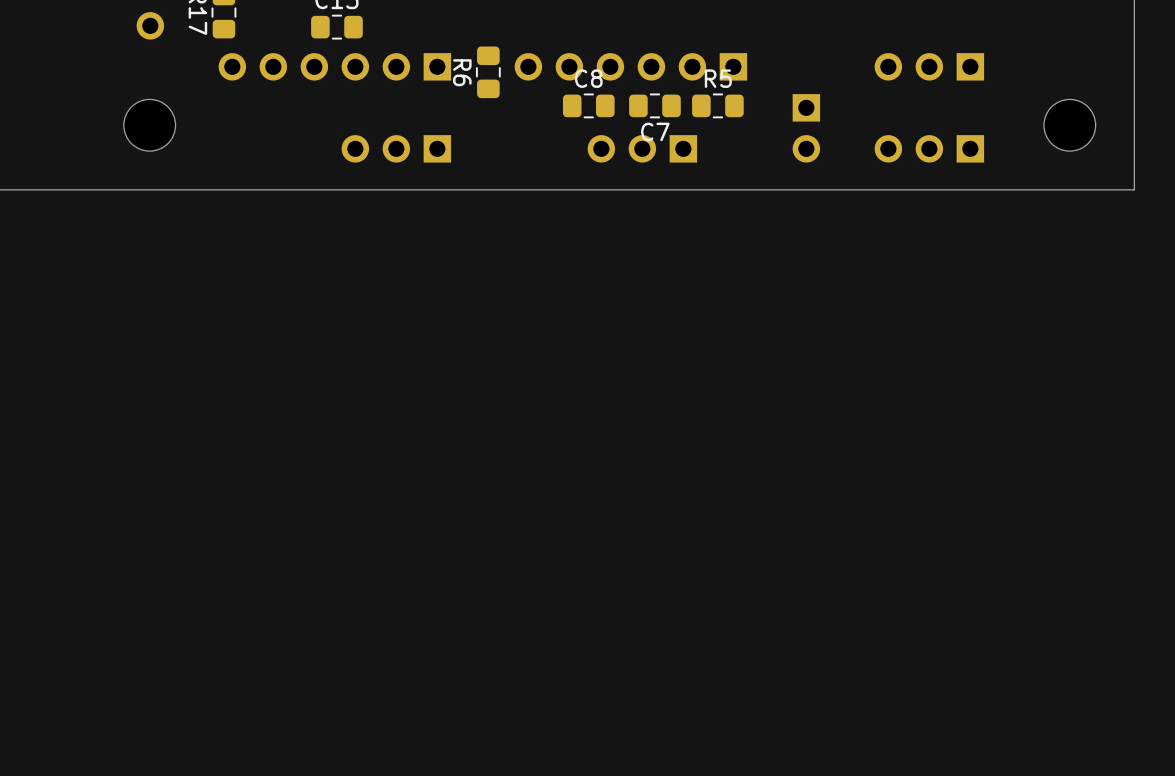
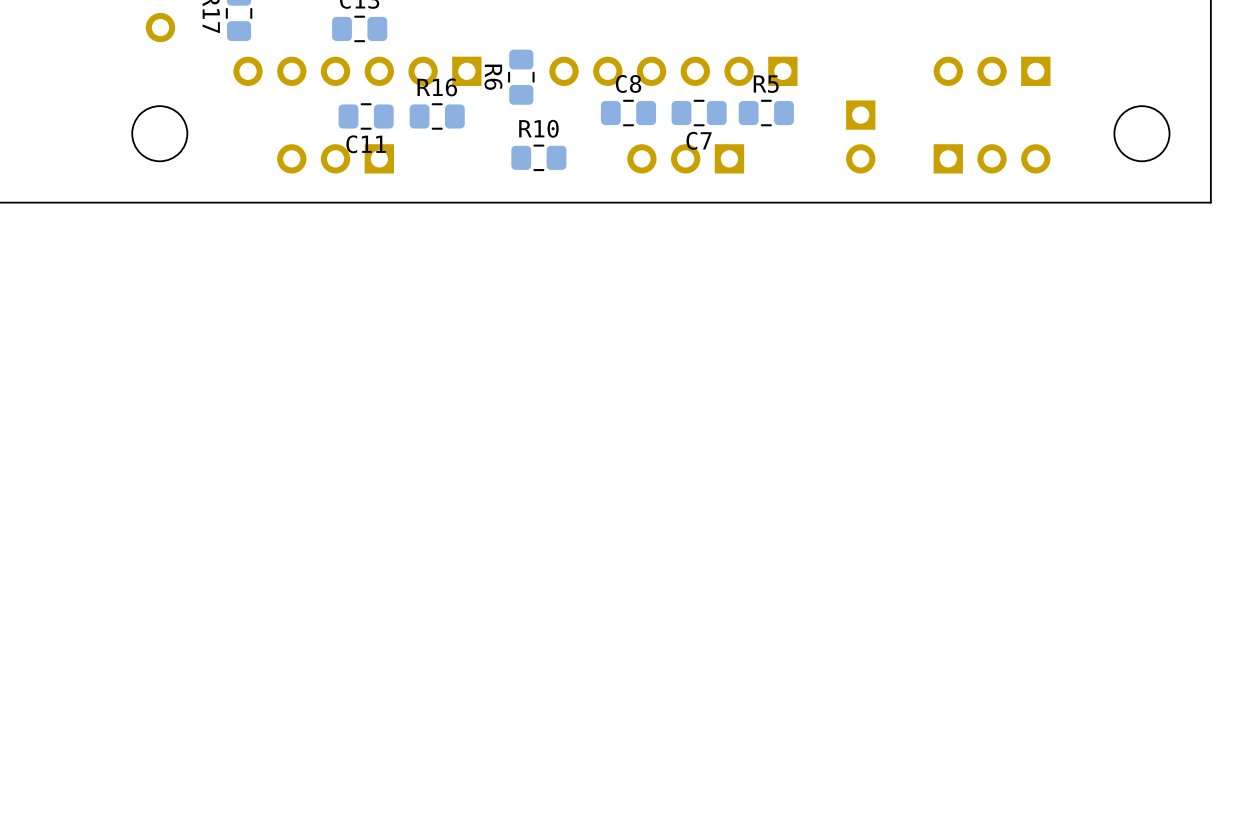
C11: none -> (366, 116)
R16: none -> (437, 116)
R10: none -> (538, 157)
part position: (396, 148) -> (335, 158)
part rotation: 0° (929, 148) -> 180° (992, 158)

